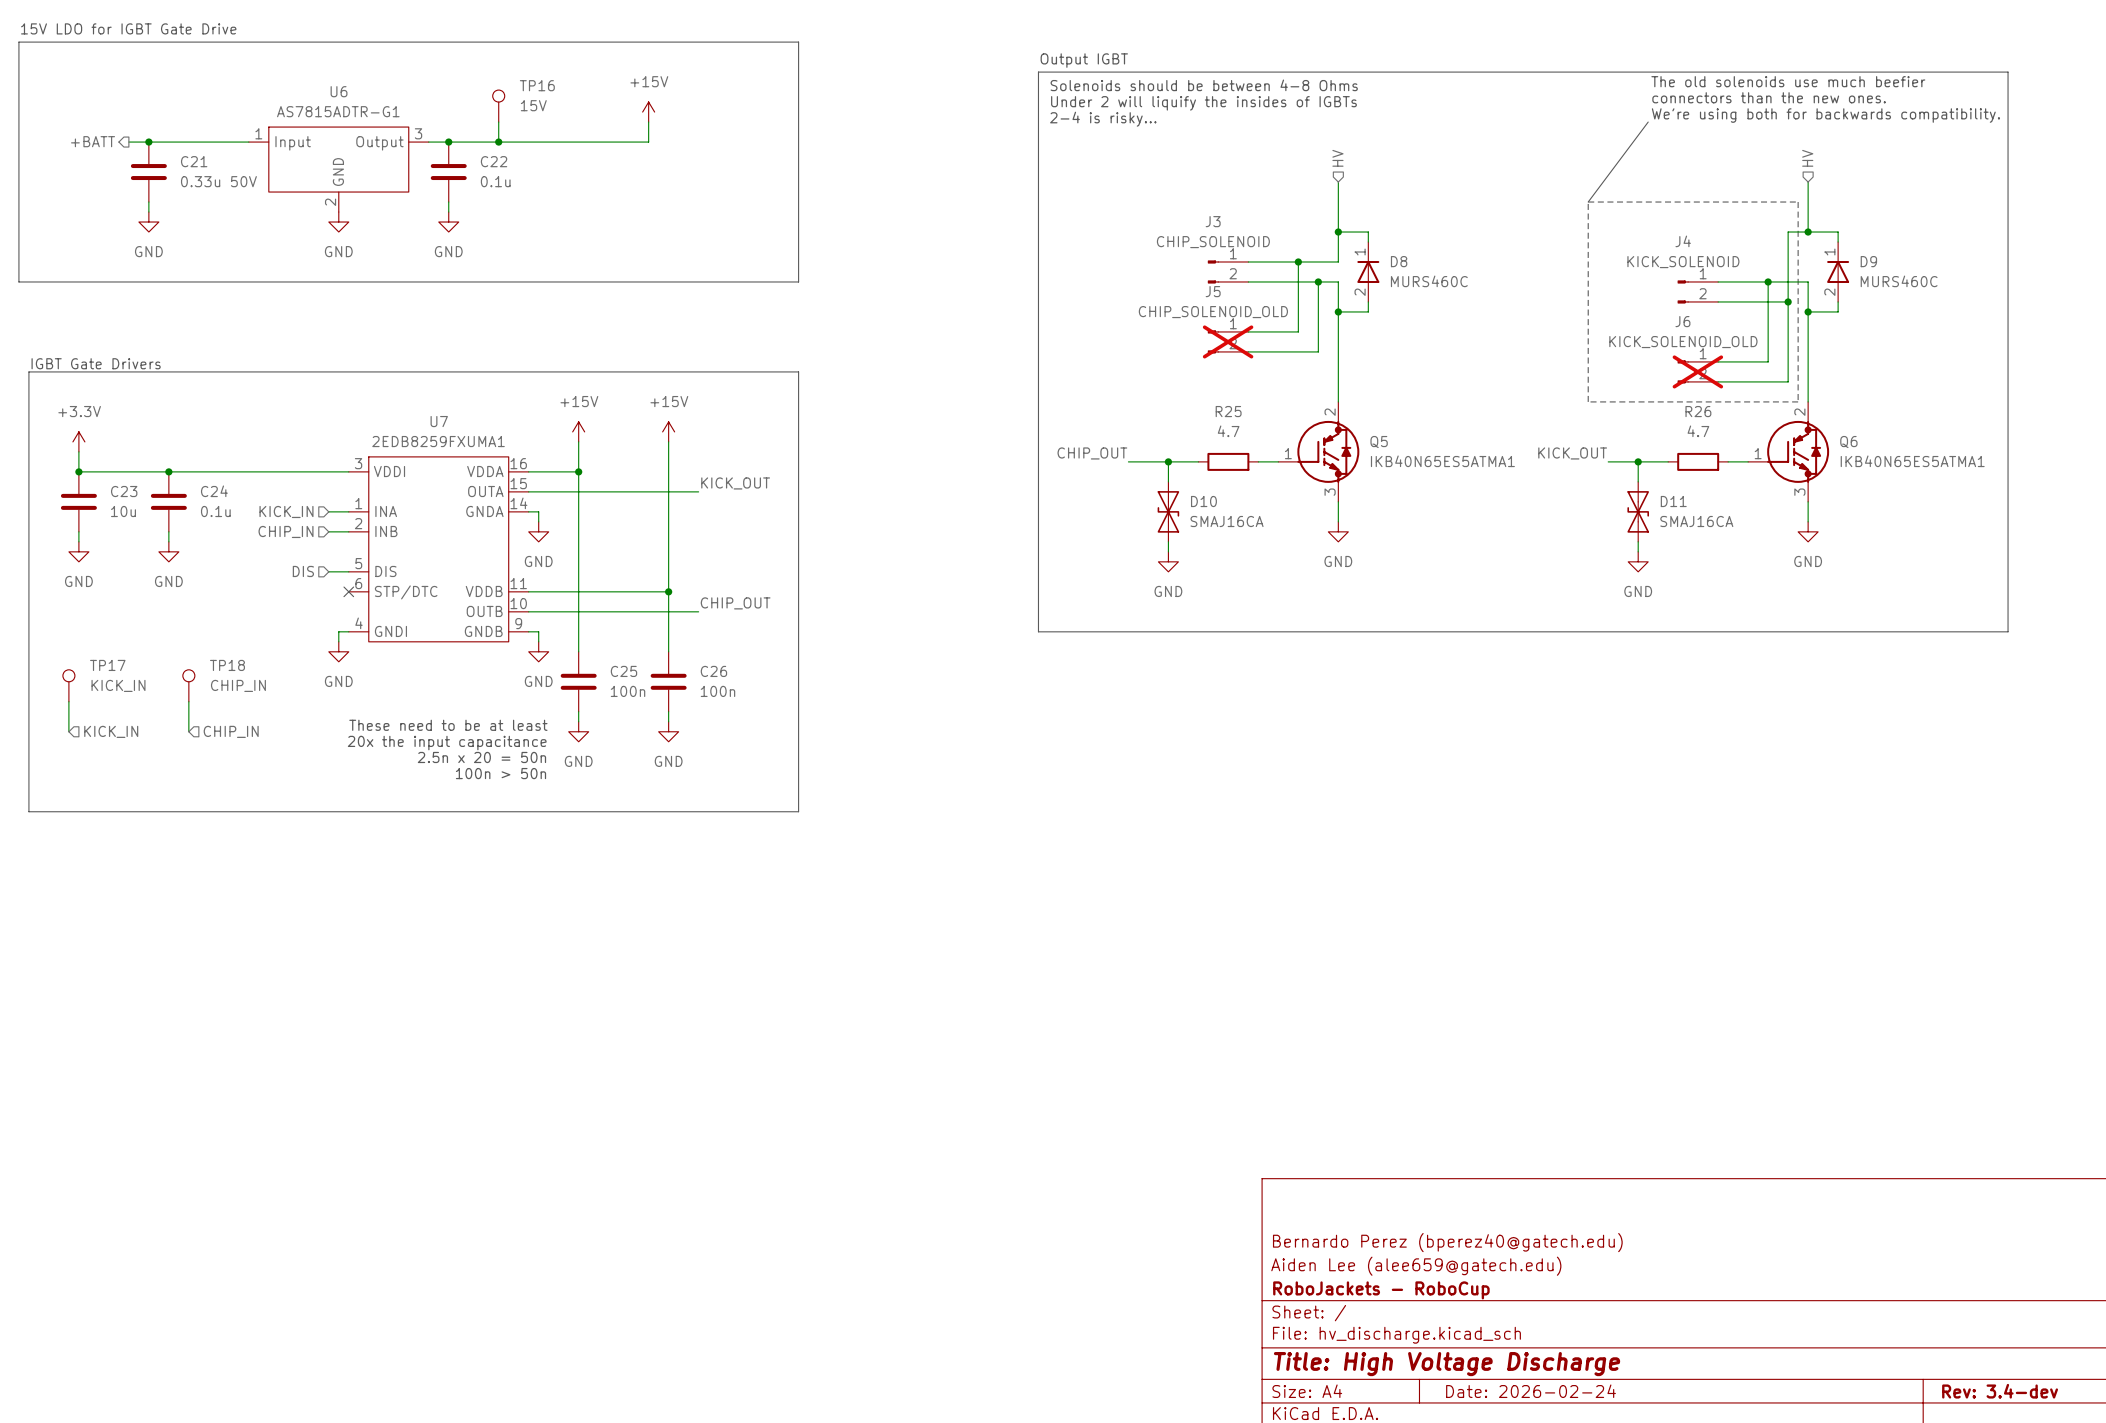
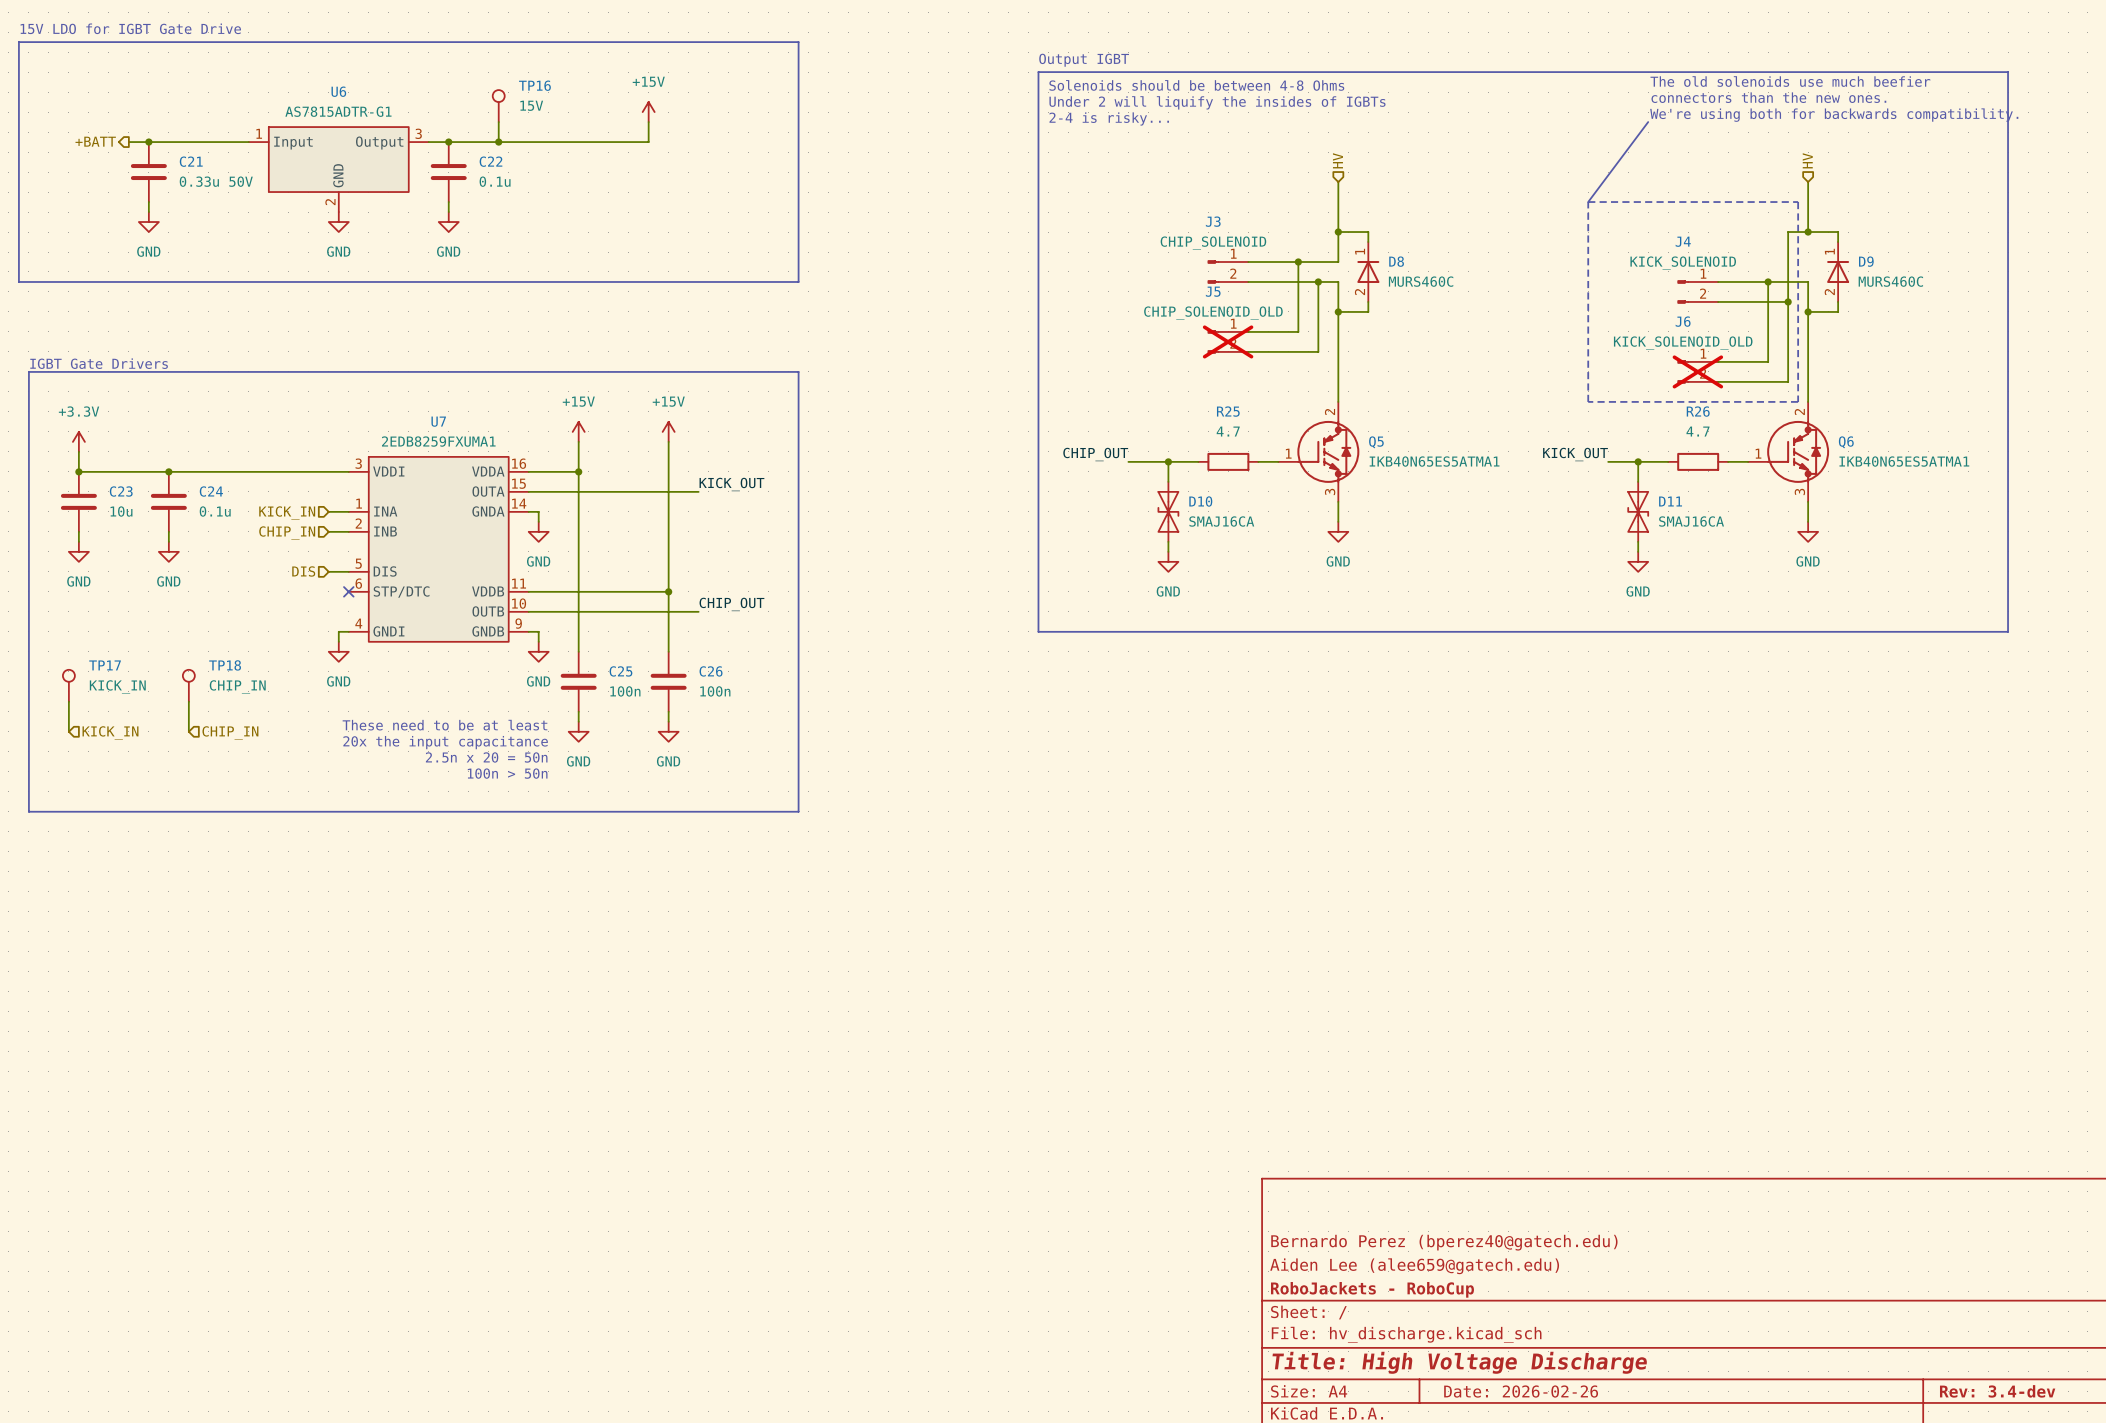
title block: Date: 2026-02-24 (1531, 1391) -> Date: 2026-02-26 (1521, 1391)

